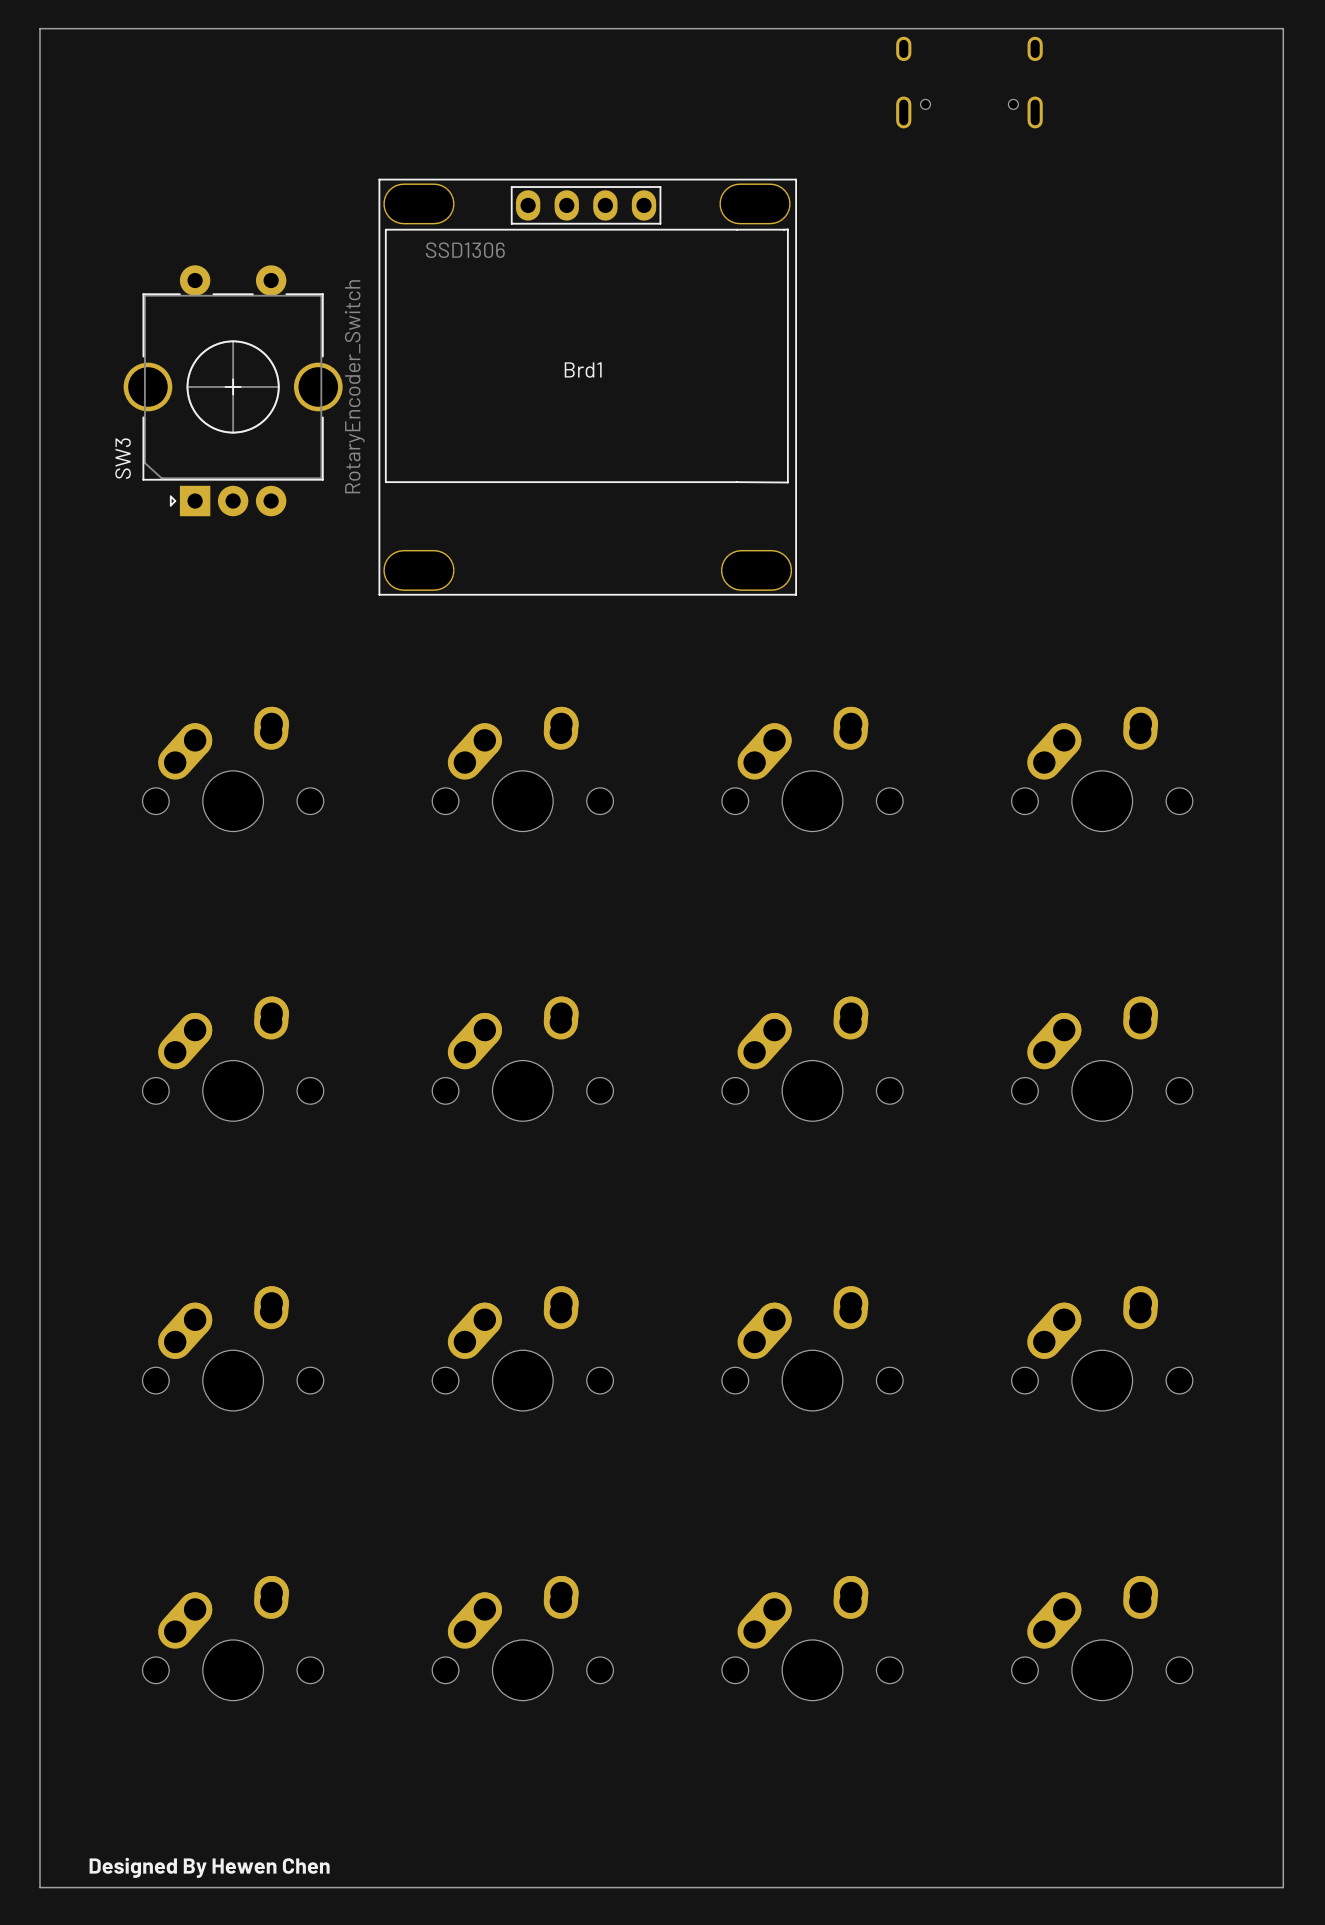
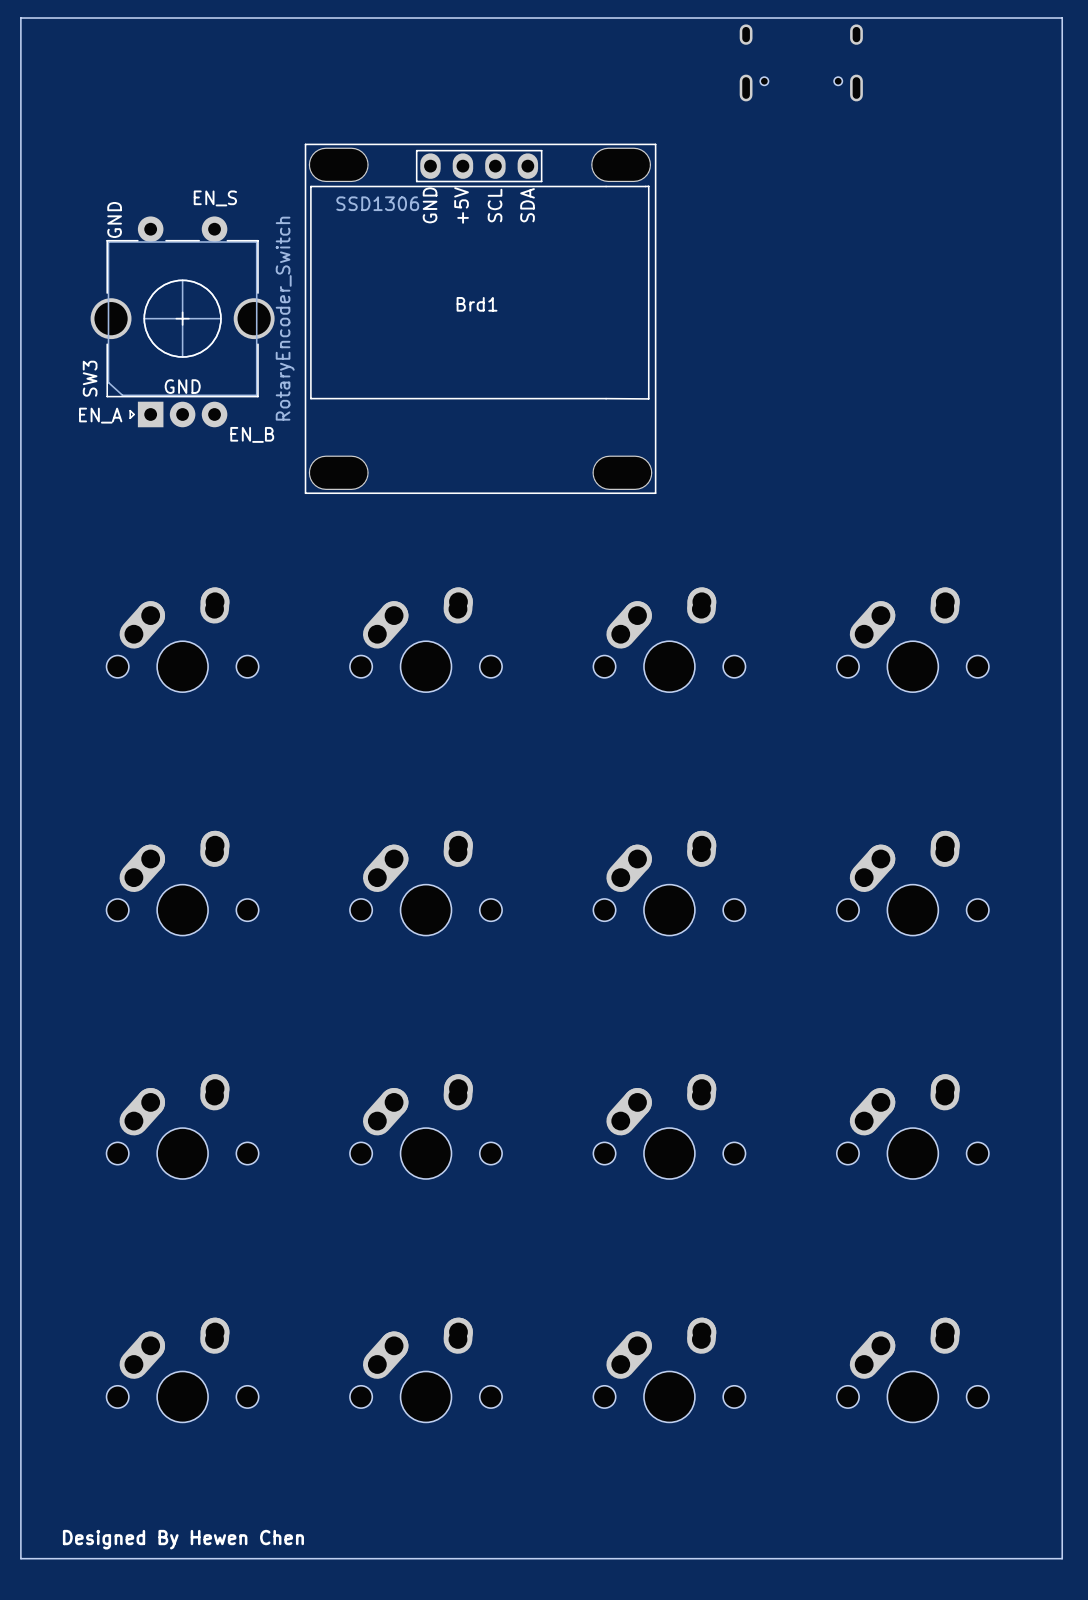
board edge: (39, 28) (1283, 28) (1283, 1887) (39, 1887) (39, 28) -> (20, 18) (20, 1558) (1062, 1558) (1062, 18) (20, 18)
text: none -> EN_S (215, 198)
text: none -> GND (430, 205)
text: none -> SDA (527, 205)
text: none -> SCL (495, 205)
text: none -> +5V (461, 205)
text: none -> GND (114, 219)
text: none -> GND (182, 386)
text: none -> EN_A (100, 415)
text: none -> EN_B (252, 434)
text position: Designed By Hewen Chen (209, 1867) -> Designed By Hewen Chen (183, 1539)

